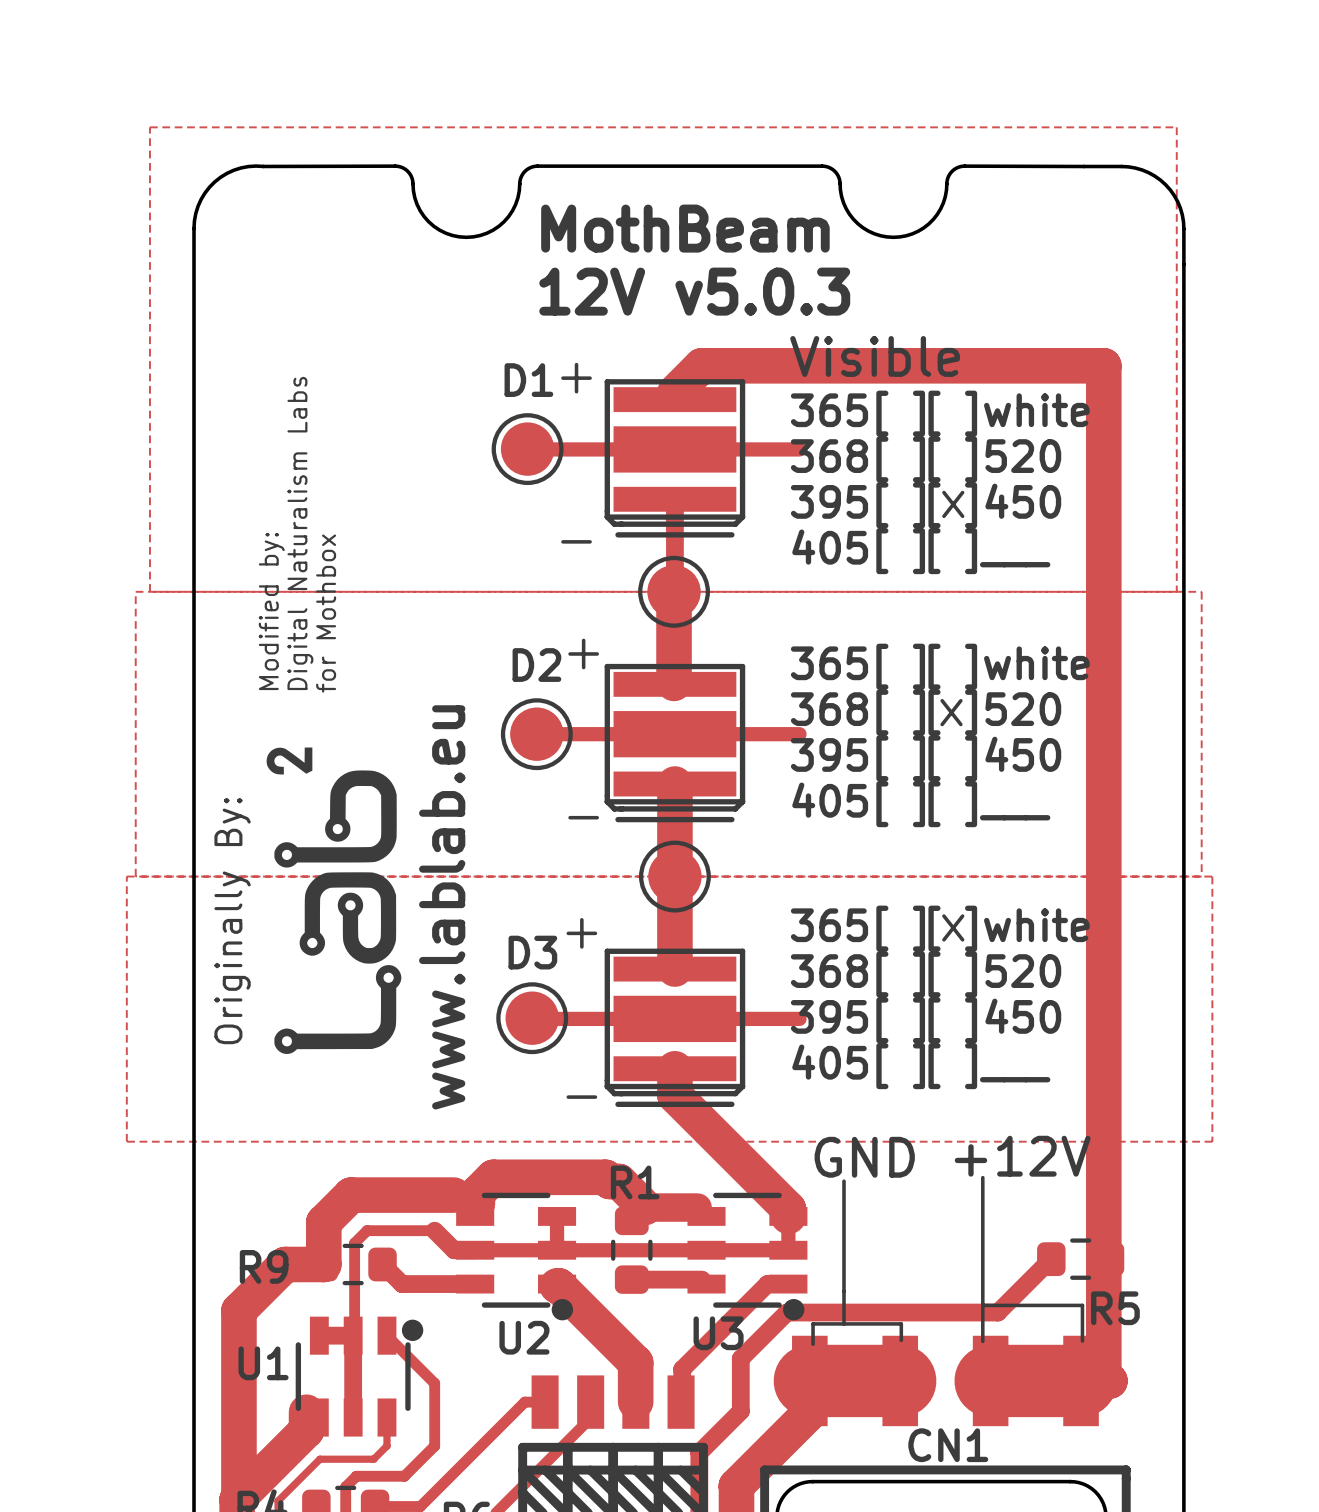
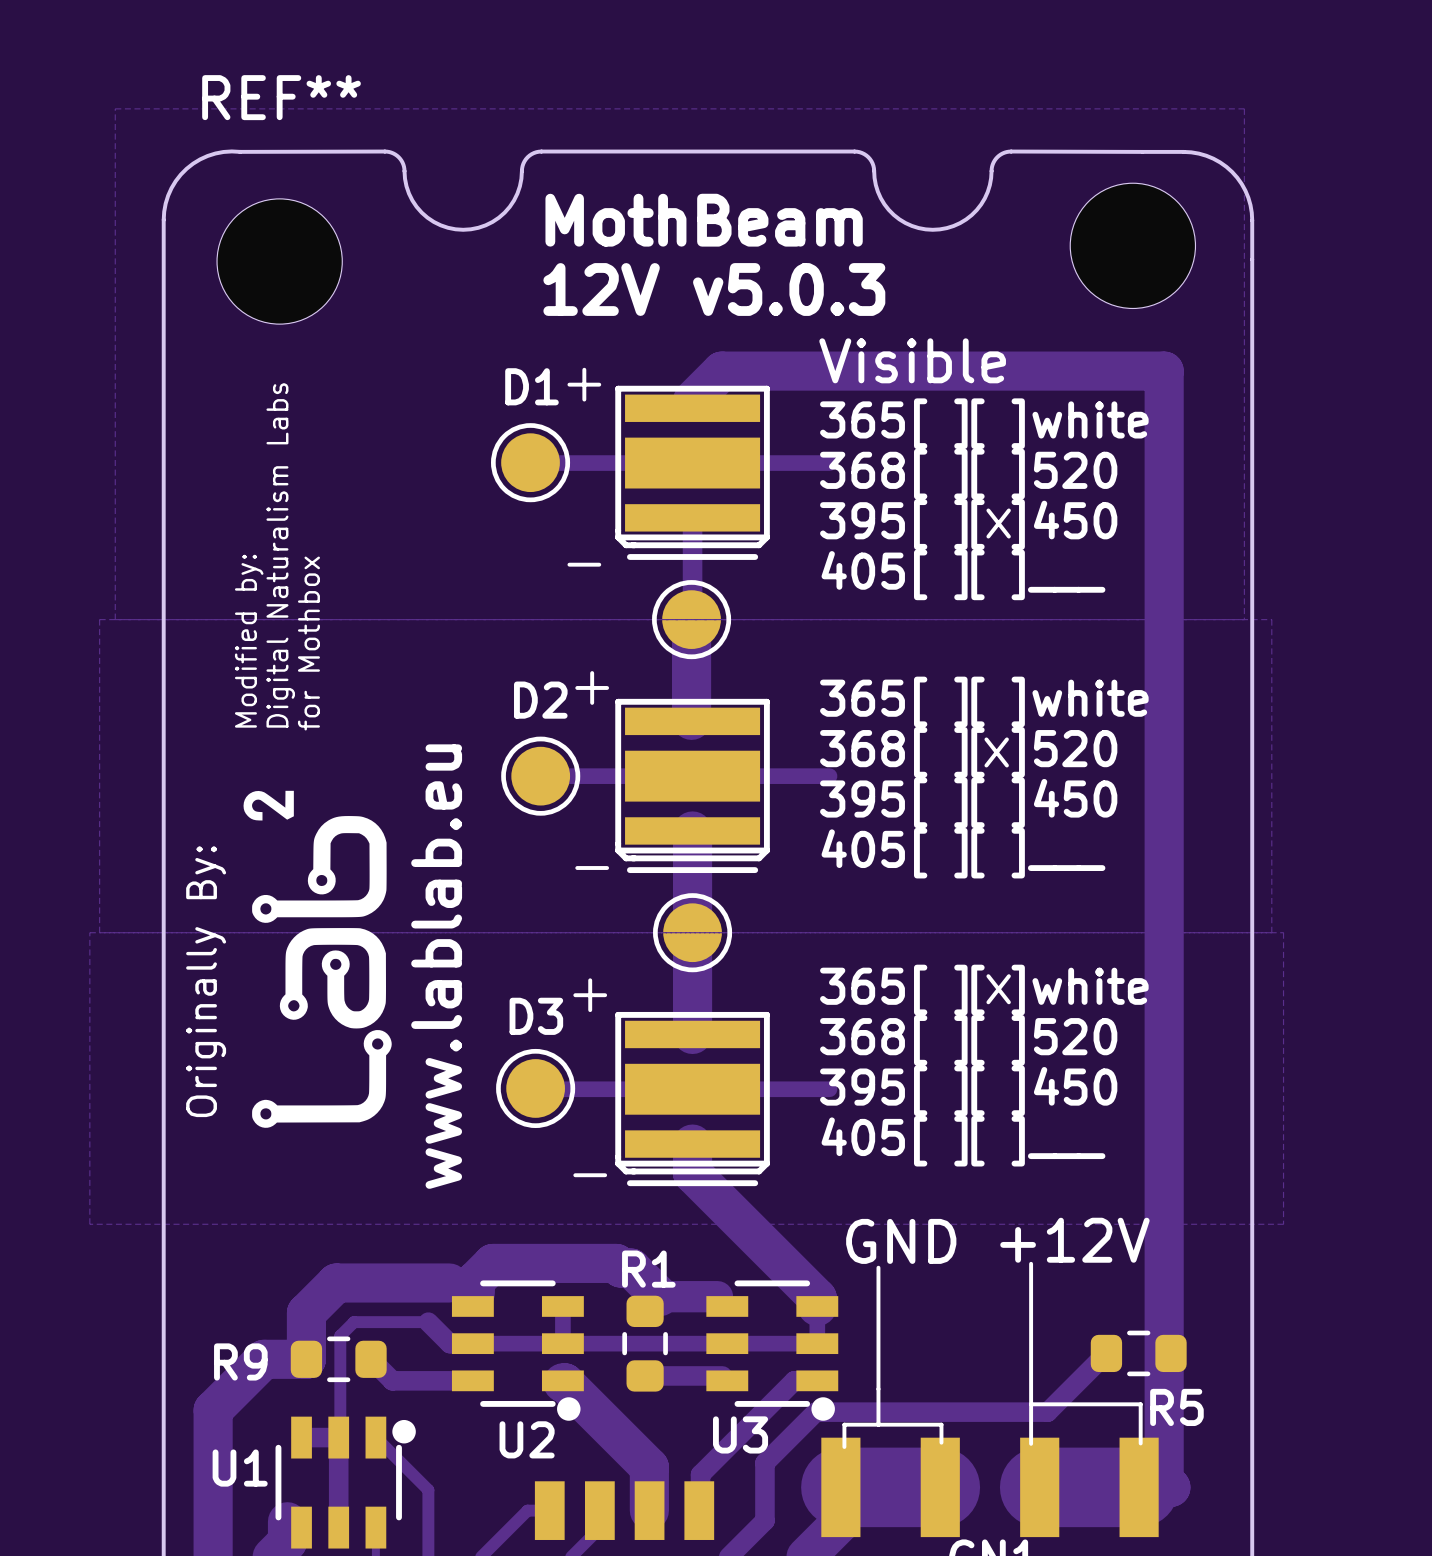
part: none -> (1132, 245)
REF**: none -> (279, 261)

